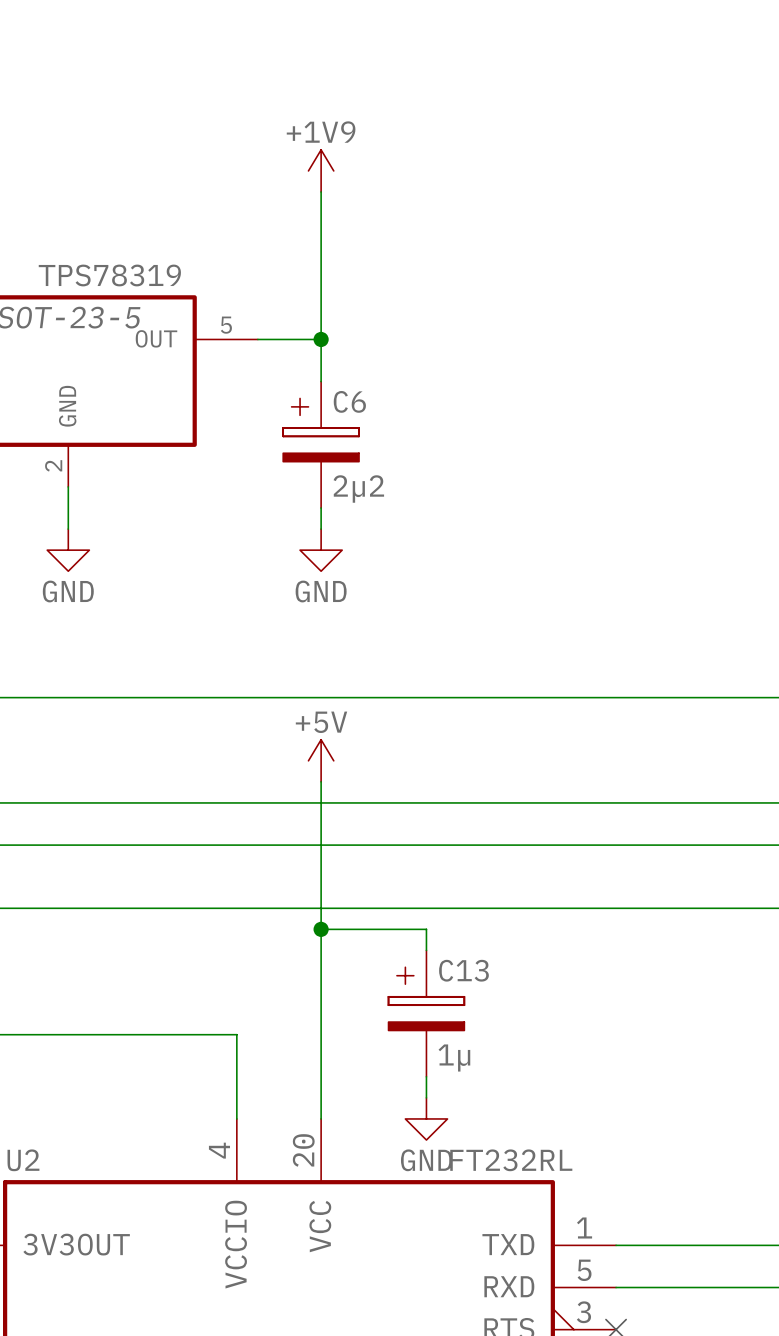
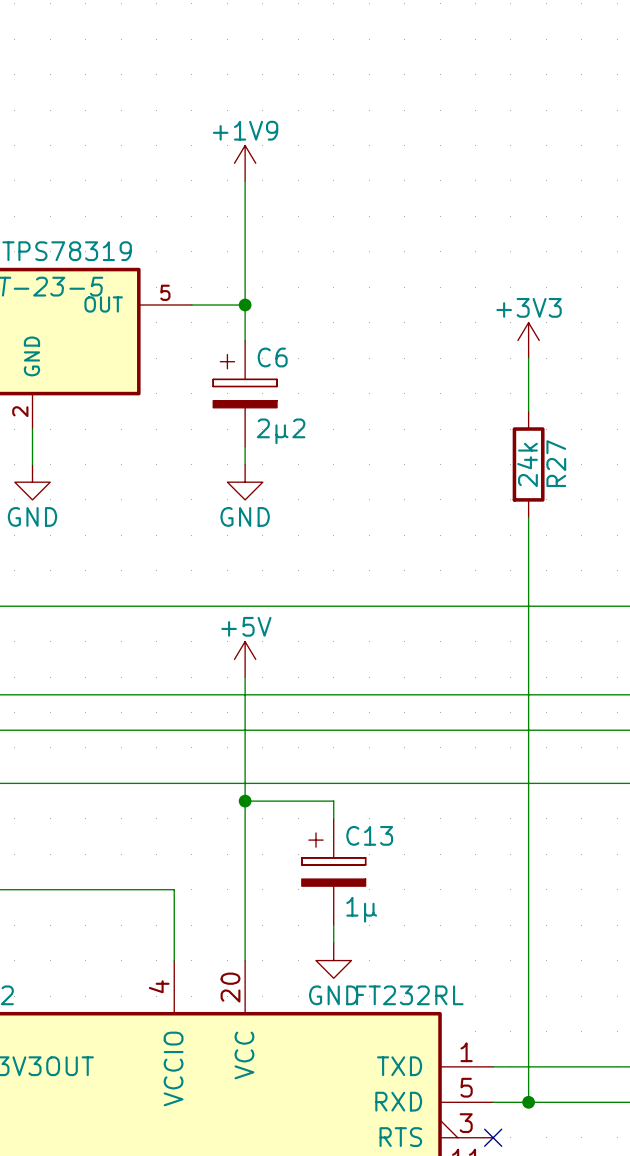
power symbol: none -> +3V3 (528, 340)
wire: none -> (528, 358) (528, 411)
R27: none -> 24k (528, 464)
wire: none -> (528, 517) (528, 1102)
junction: none -> (528, 1102)

